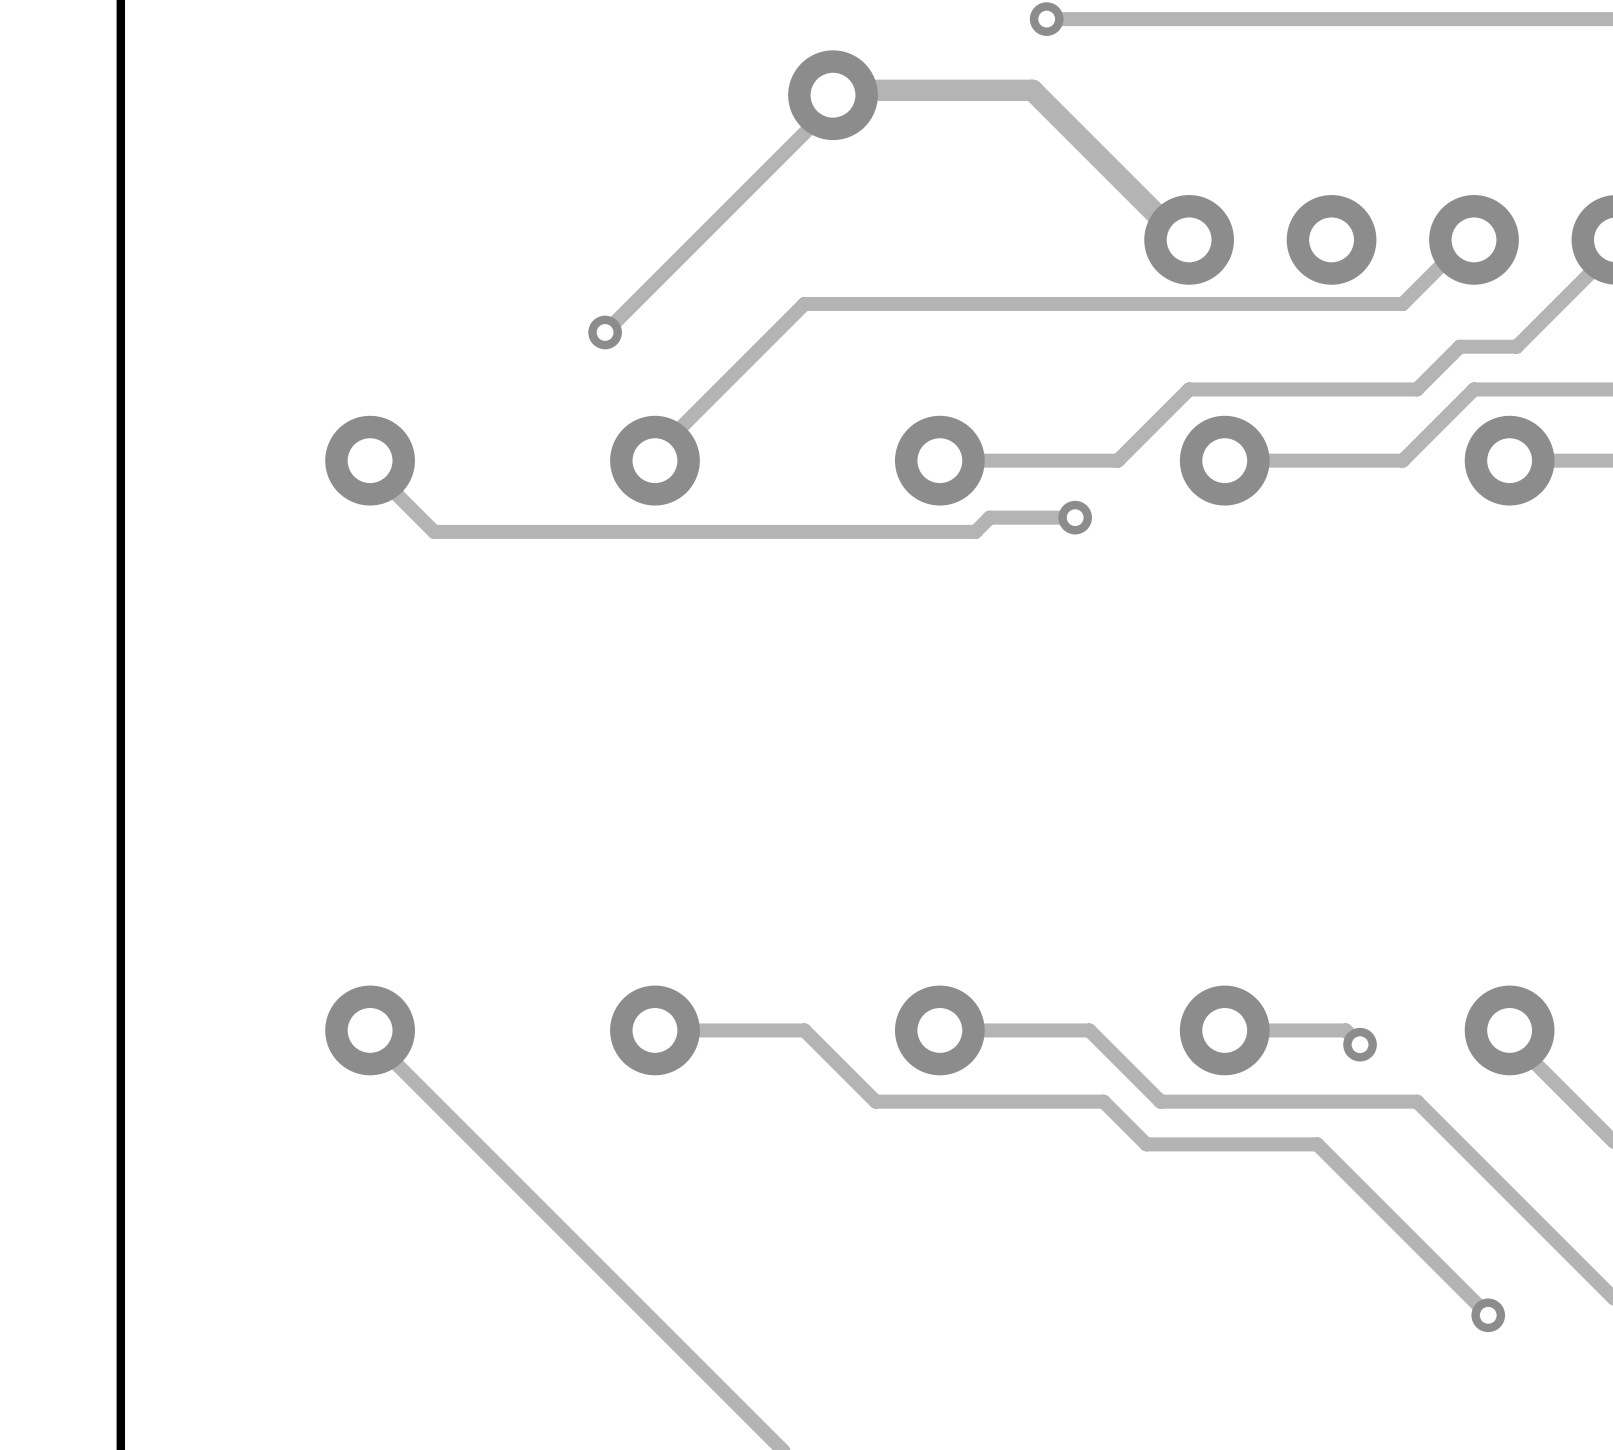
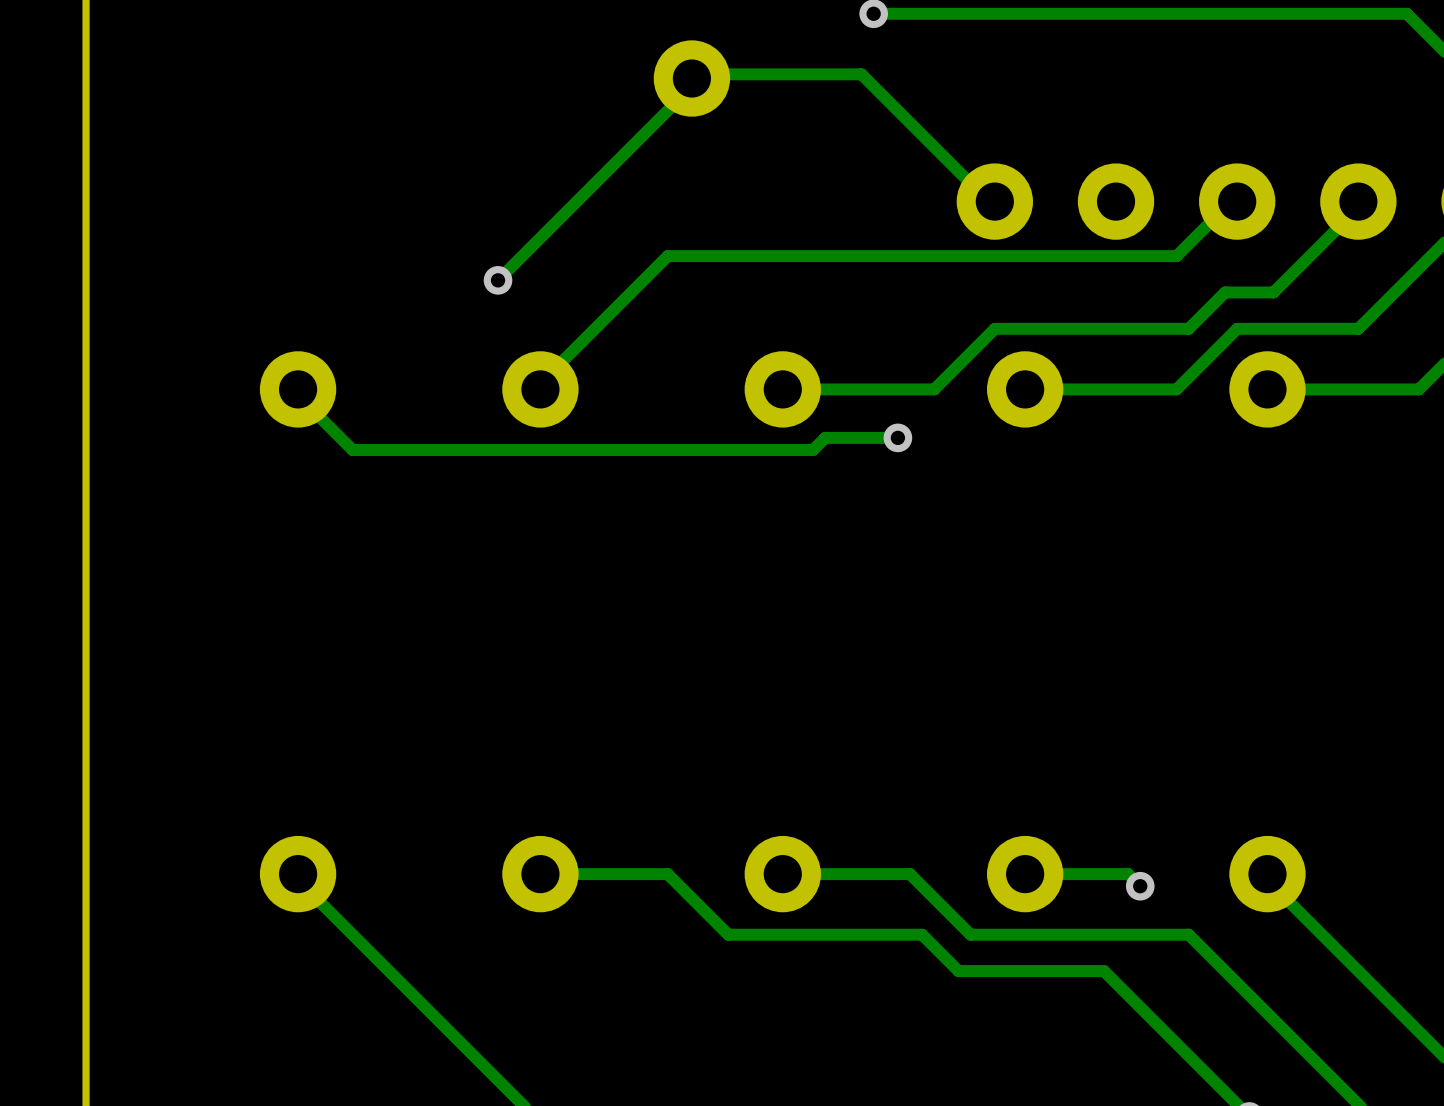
track width: thick (833, 90) (1032, 90) (1189, 247) -> thin (691, 74) (861, 74) (994, 207)

